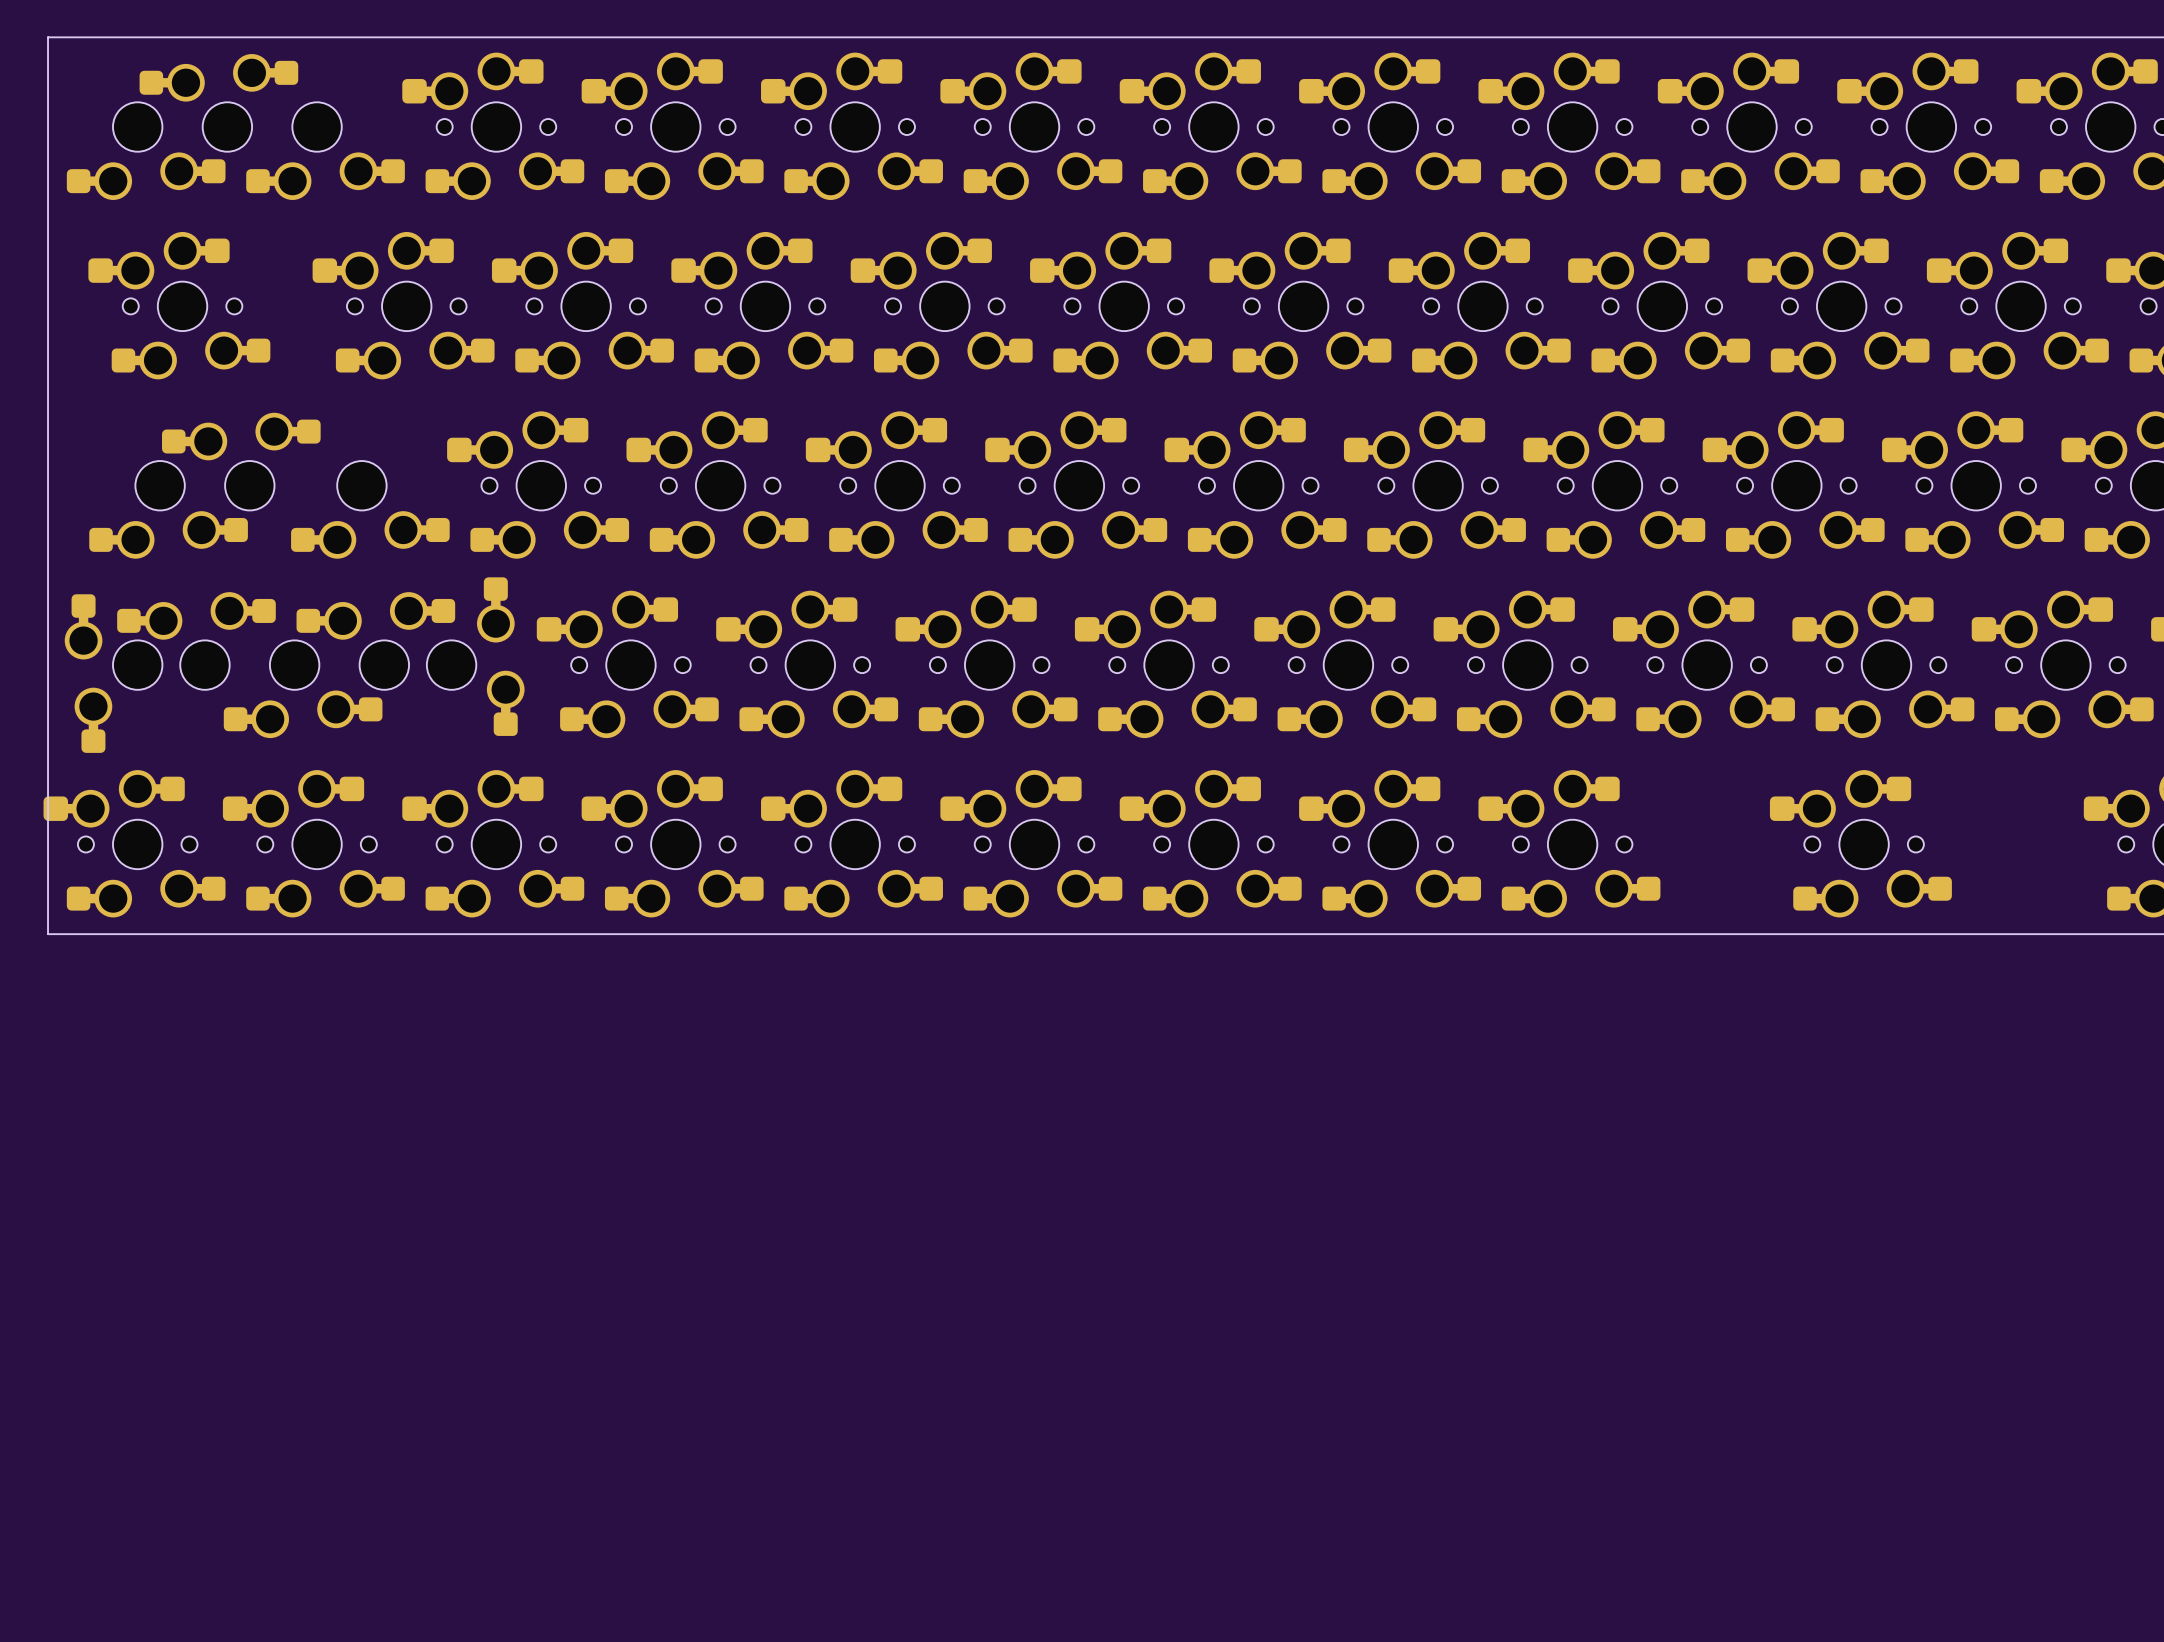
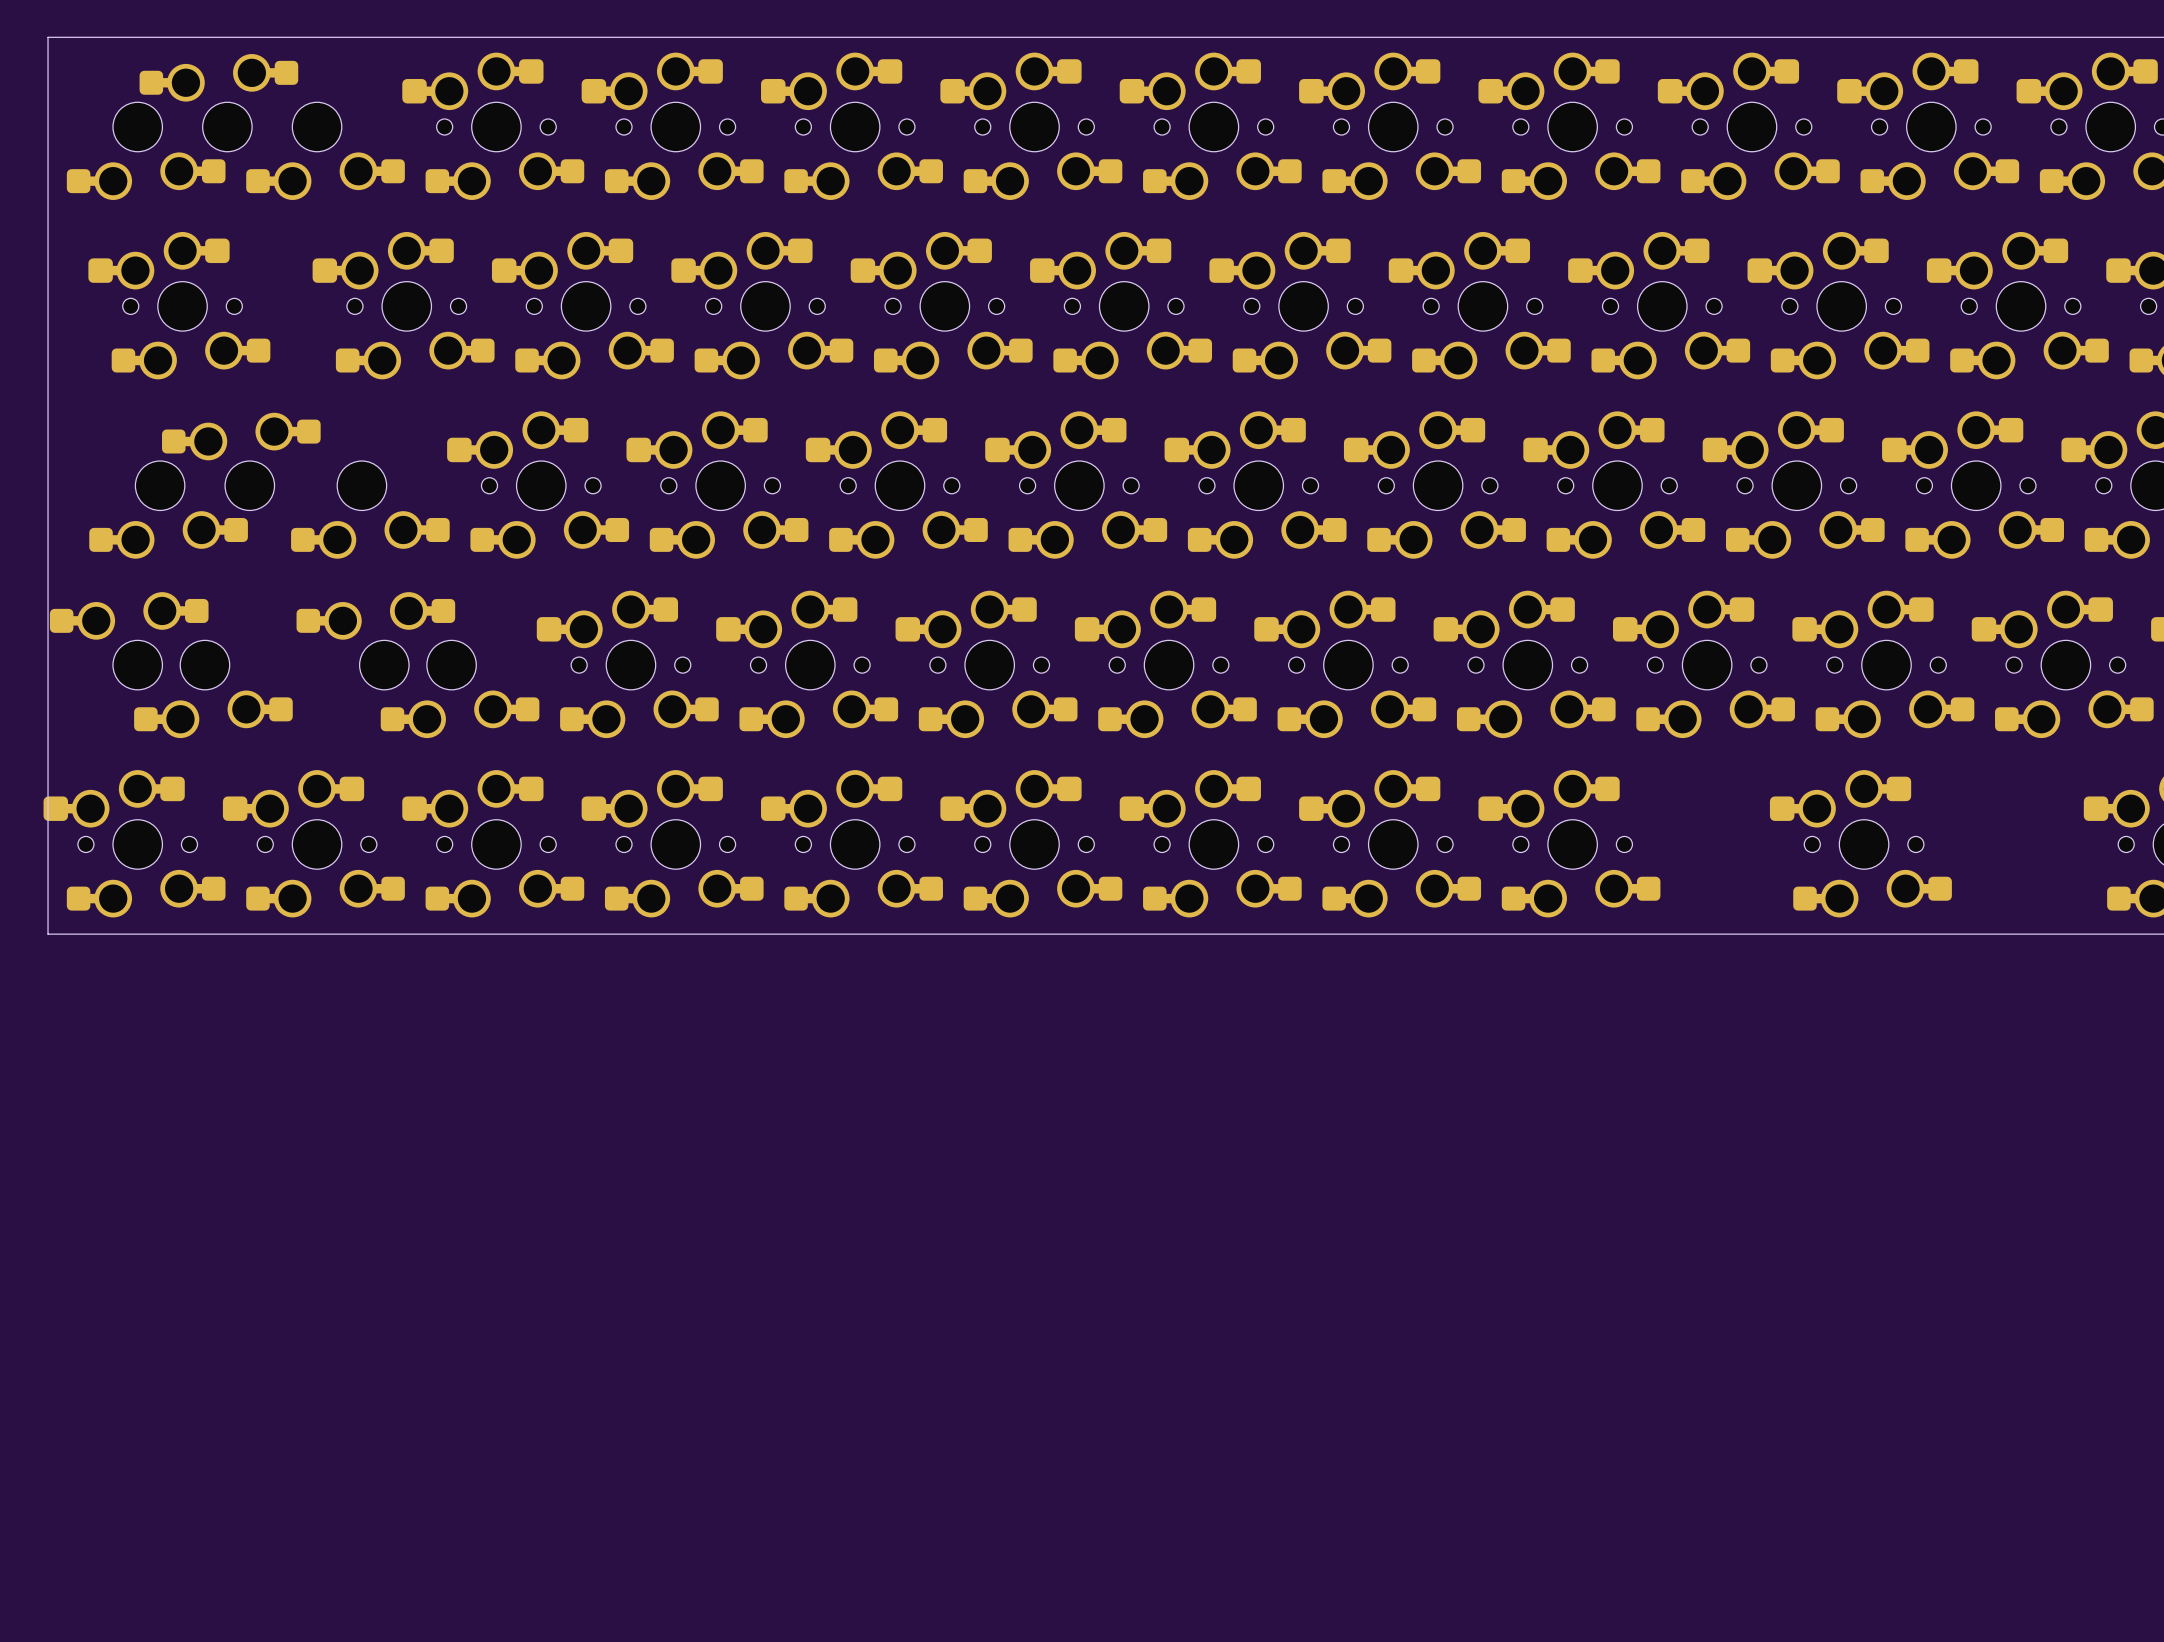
part: none -> (129, 640)
part: (196, 640) -> none
part rotation: 0° (475, 656) -> 90° clockwise (460, 689)
part: (113, 673) -> none
part: none -> (213, 689)
part: (303, 689) -> none

